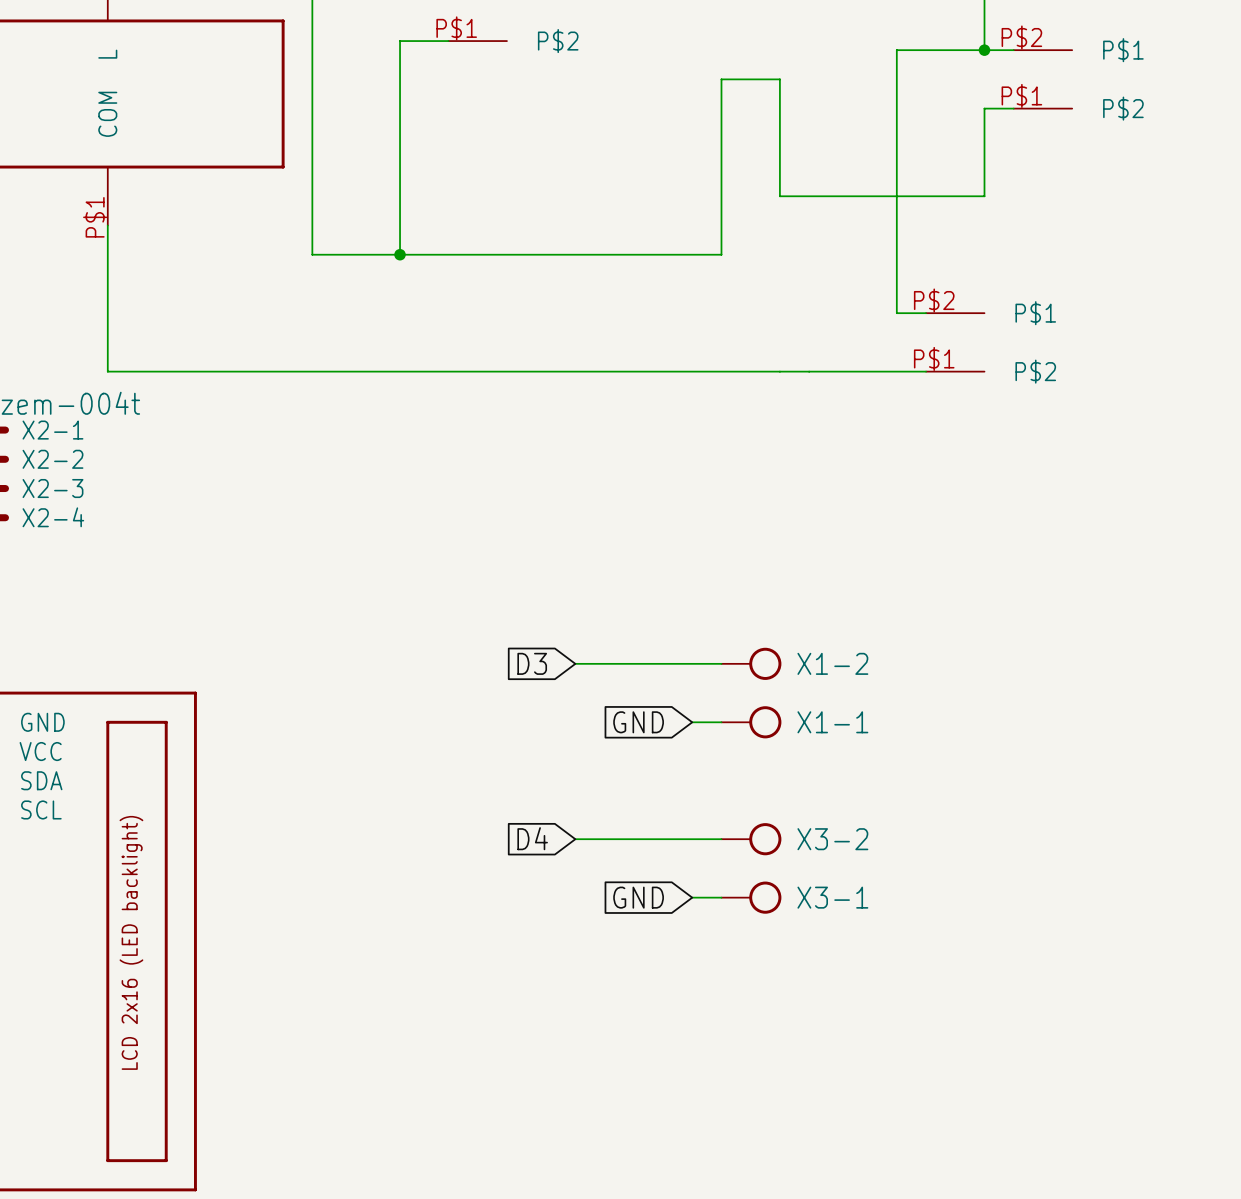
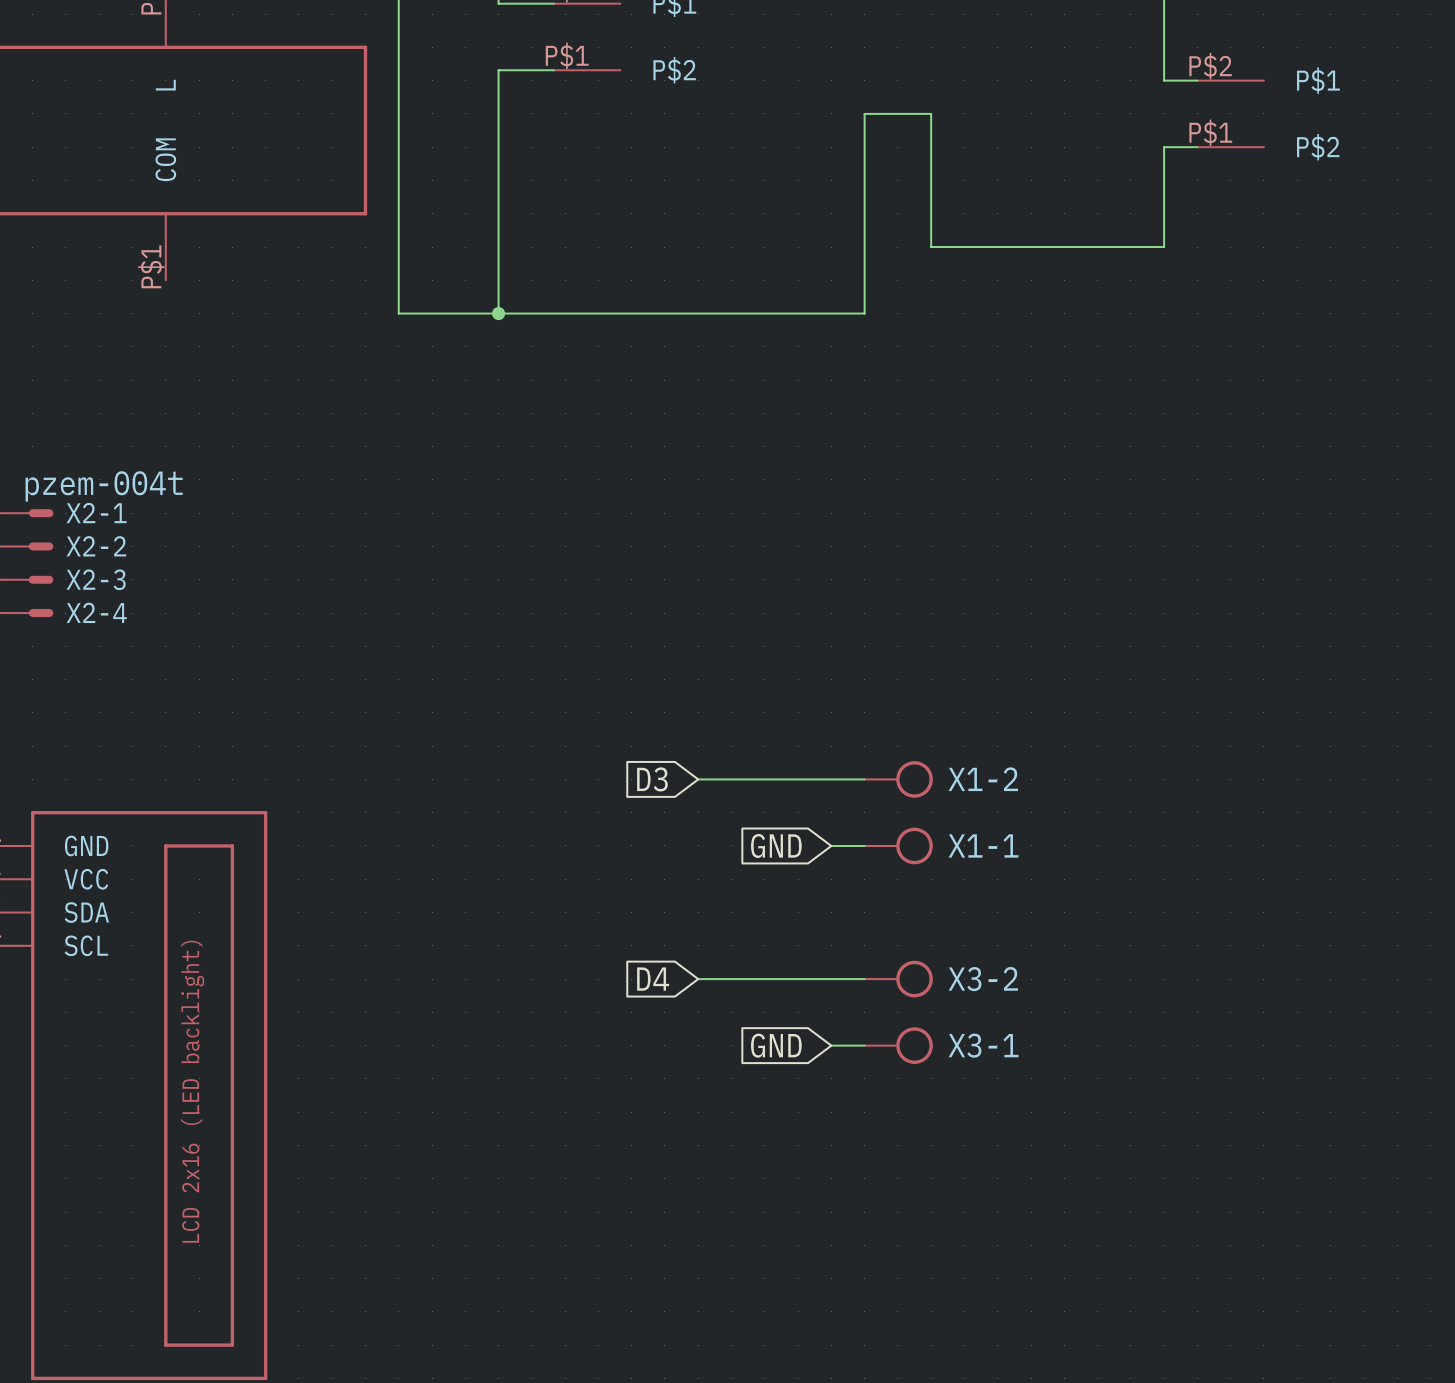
wire: (984, 50) (896, 50) (896, 313) (926, 313) -> none
junction: (984, 50) -> none
wire: (107, 225) (107, 371) (926, 371) -> none
part: (955, 342) -> none

